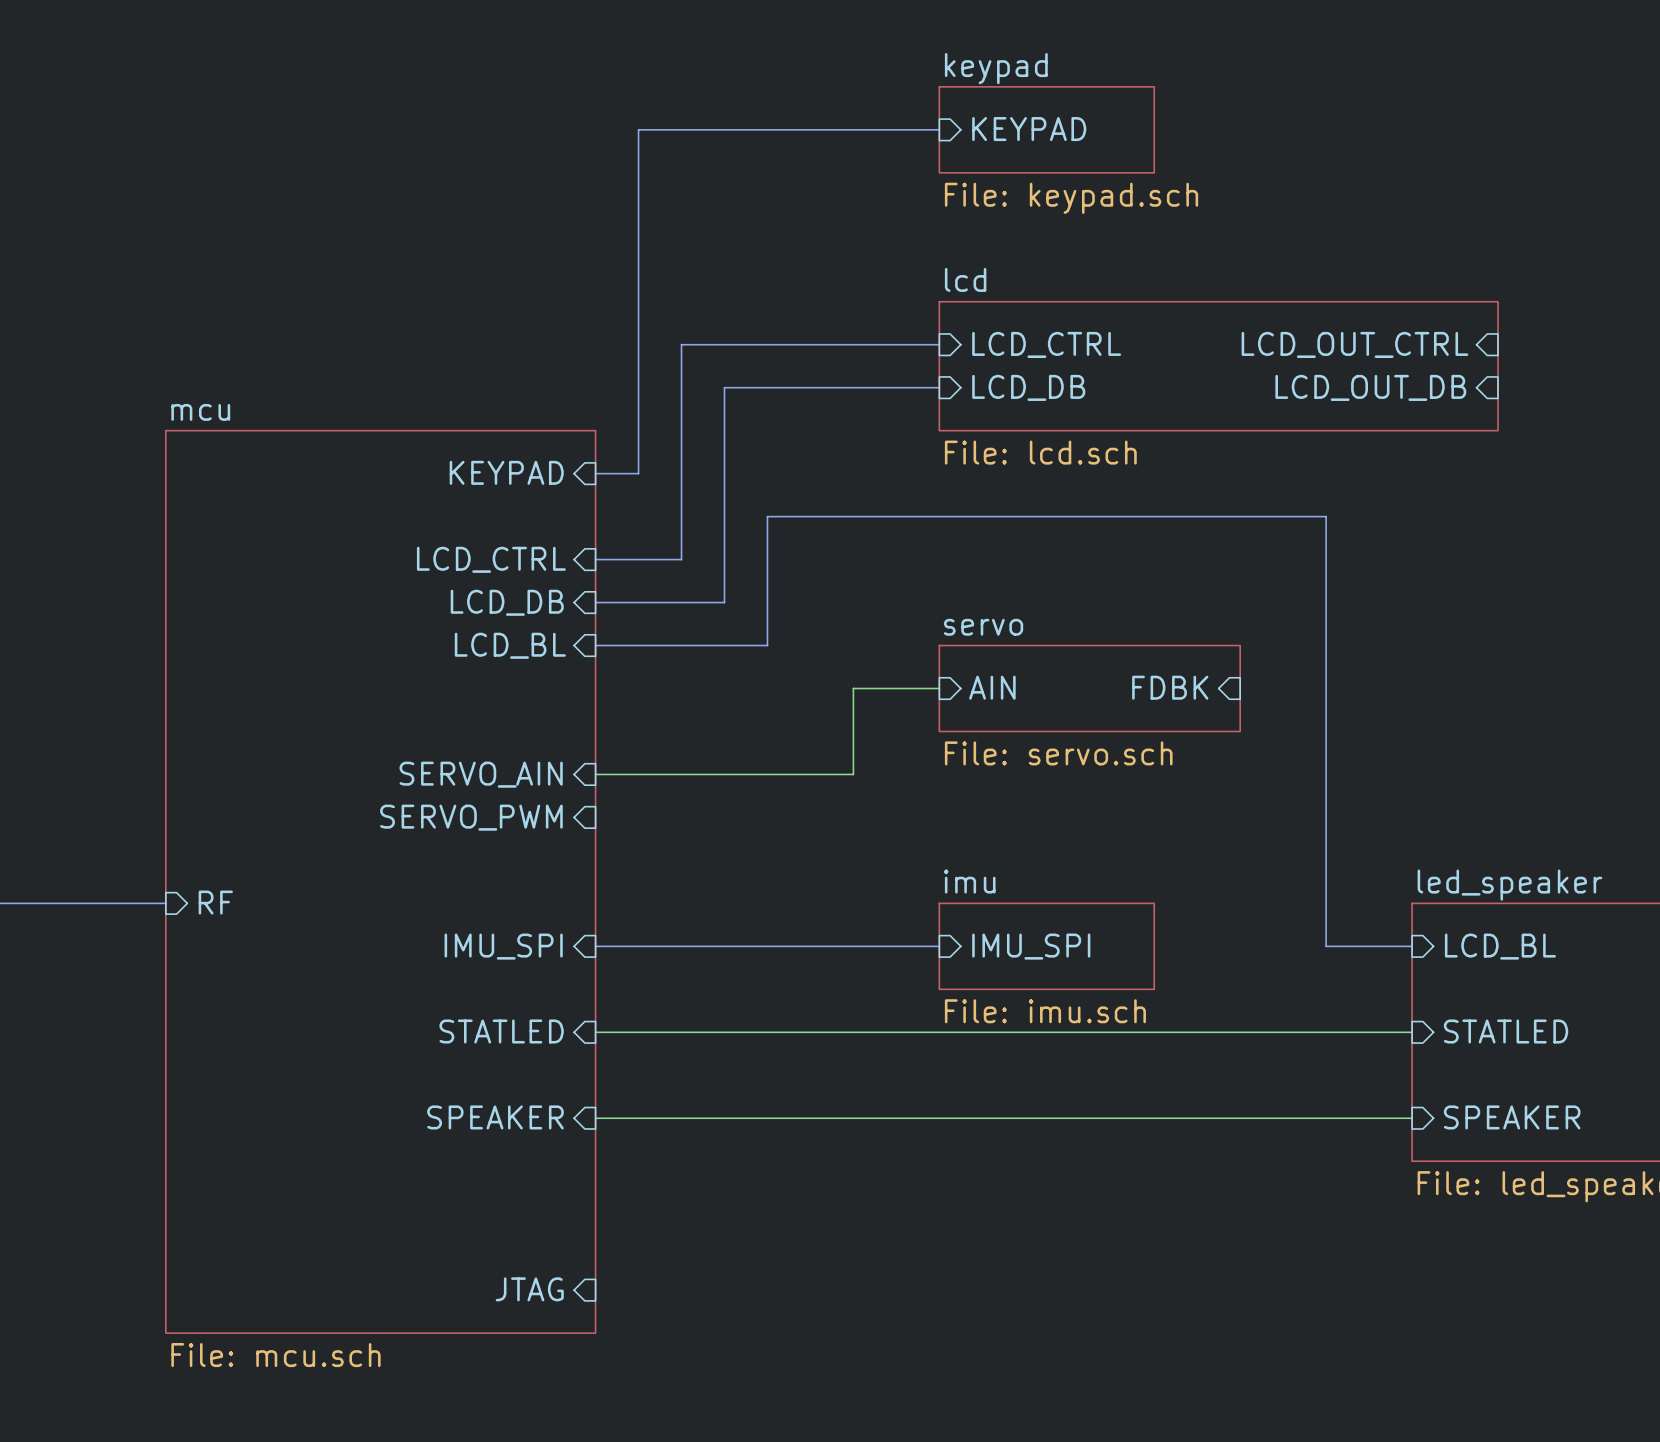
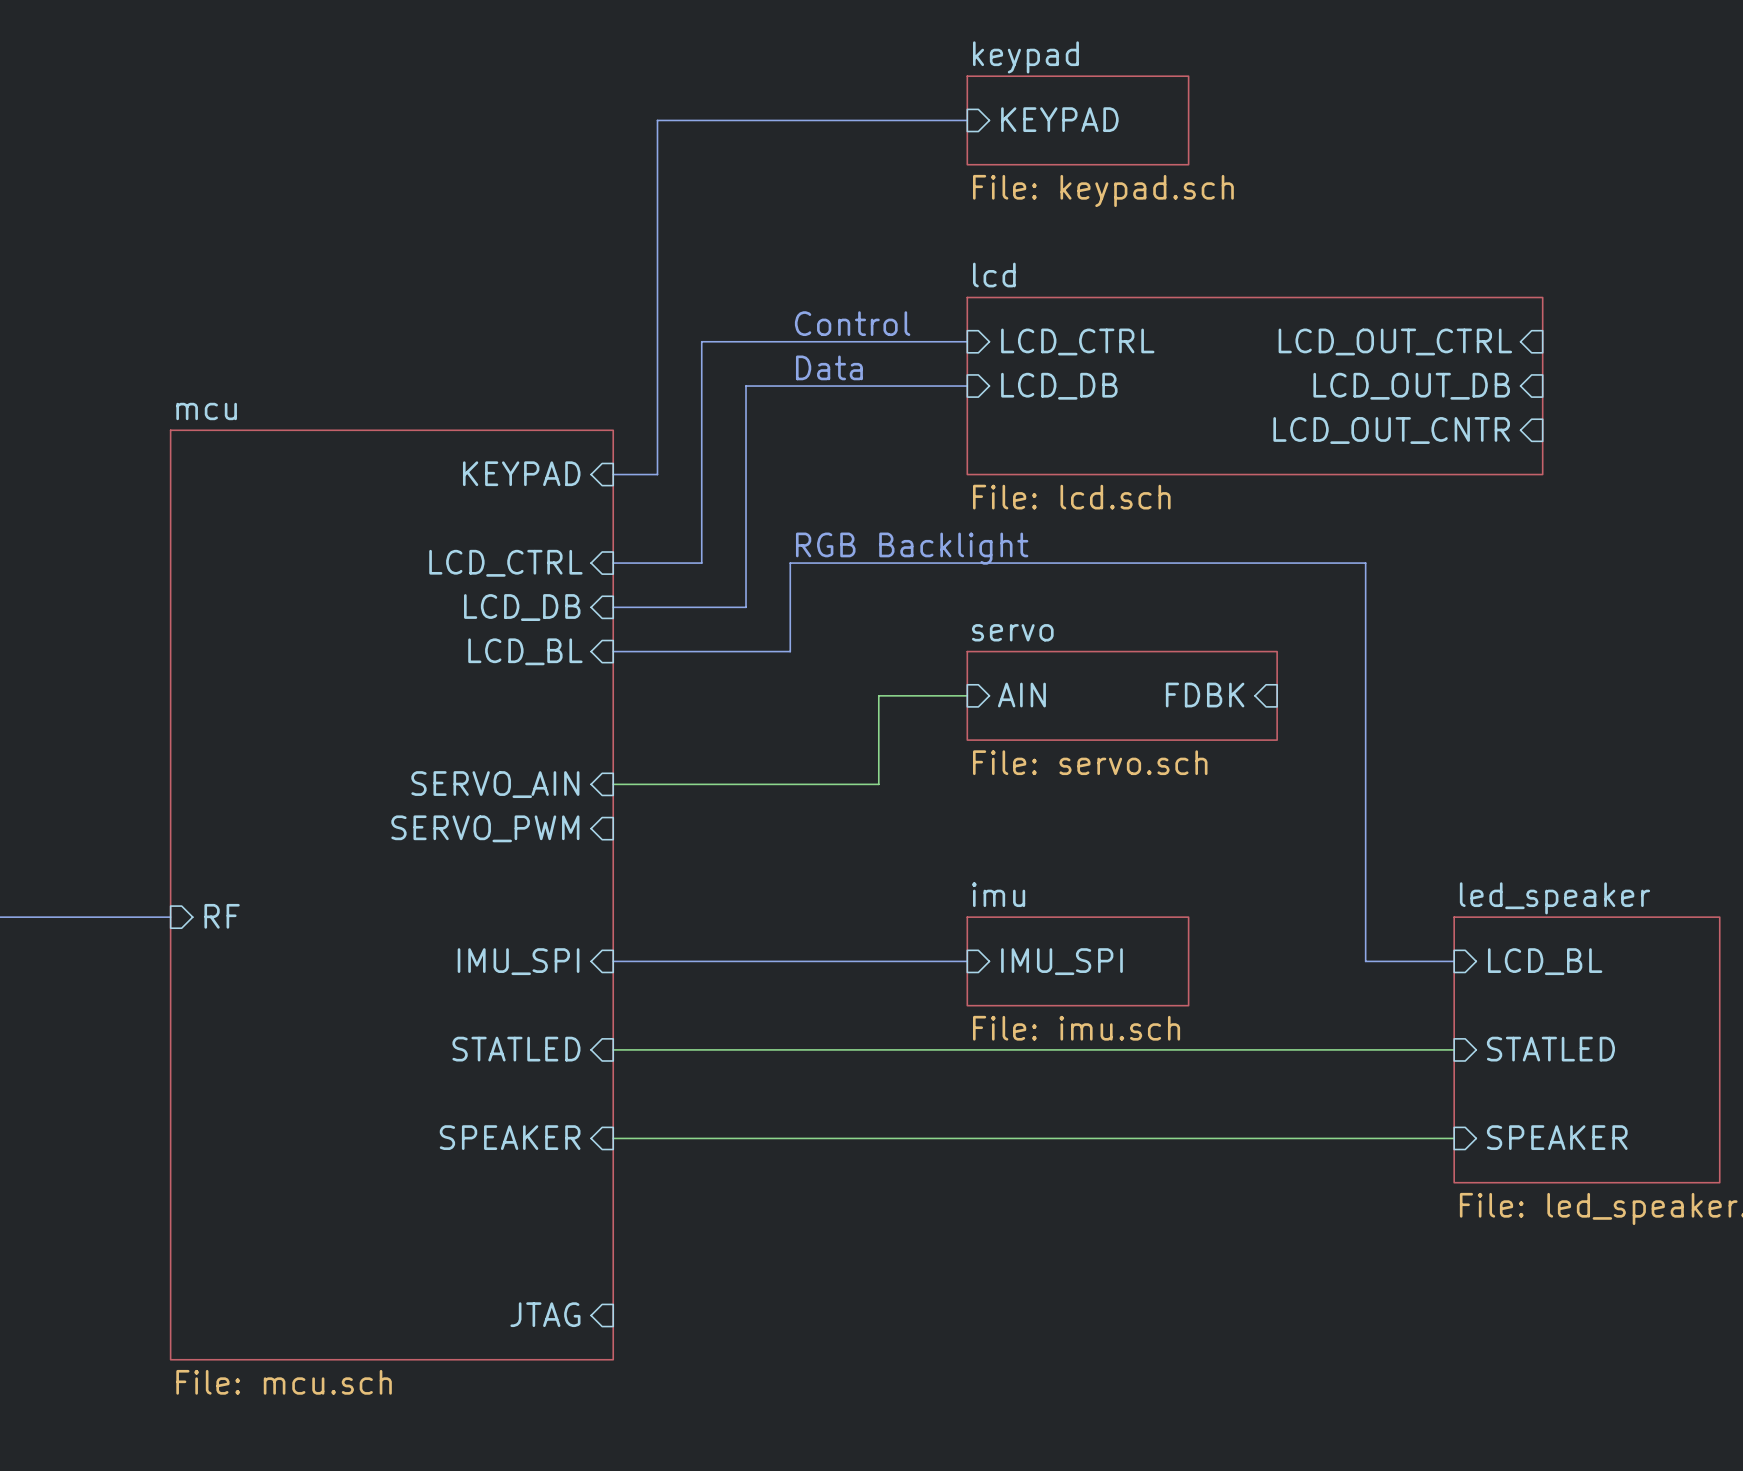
text: none -> Control (852, 323)
sheet lcd: File: lcd.sch (1218, 366) -> none
text: none -> Data (829, 367)
sheet lcd: none -> File: lcd.sch (1255, 386)
sheet pin: none -> LCD_OUT_CNTR (1391, 430)
text: none -> RGB Backlight (912, 548)
bus: (767, 559) (767, 516) (1326, 516) (1326, 559) -> (790, 563) (1365, 563)

